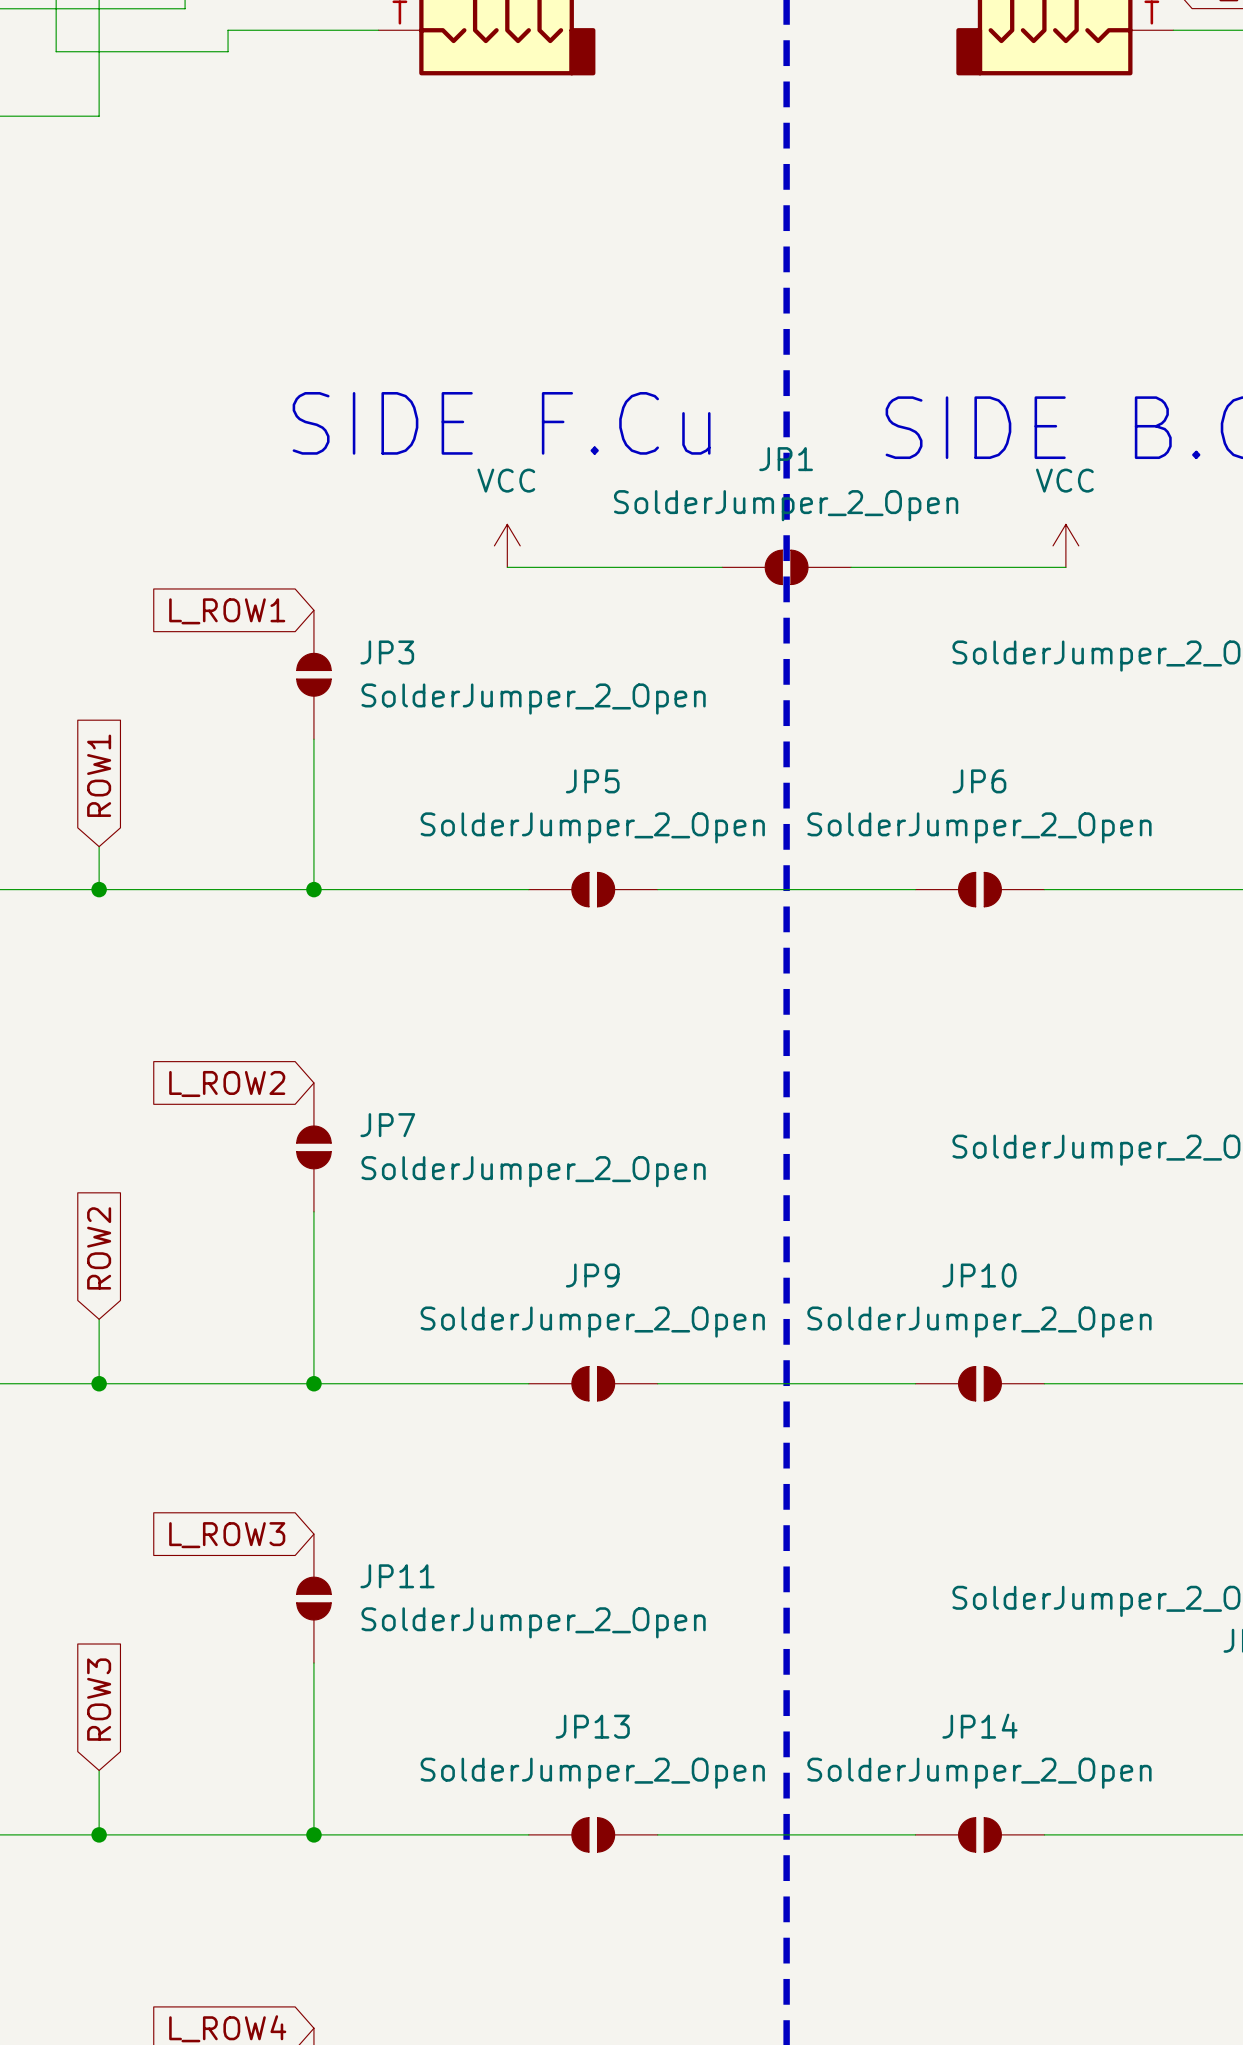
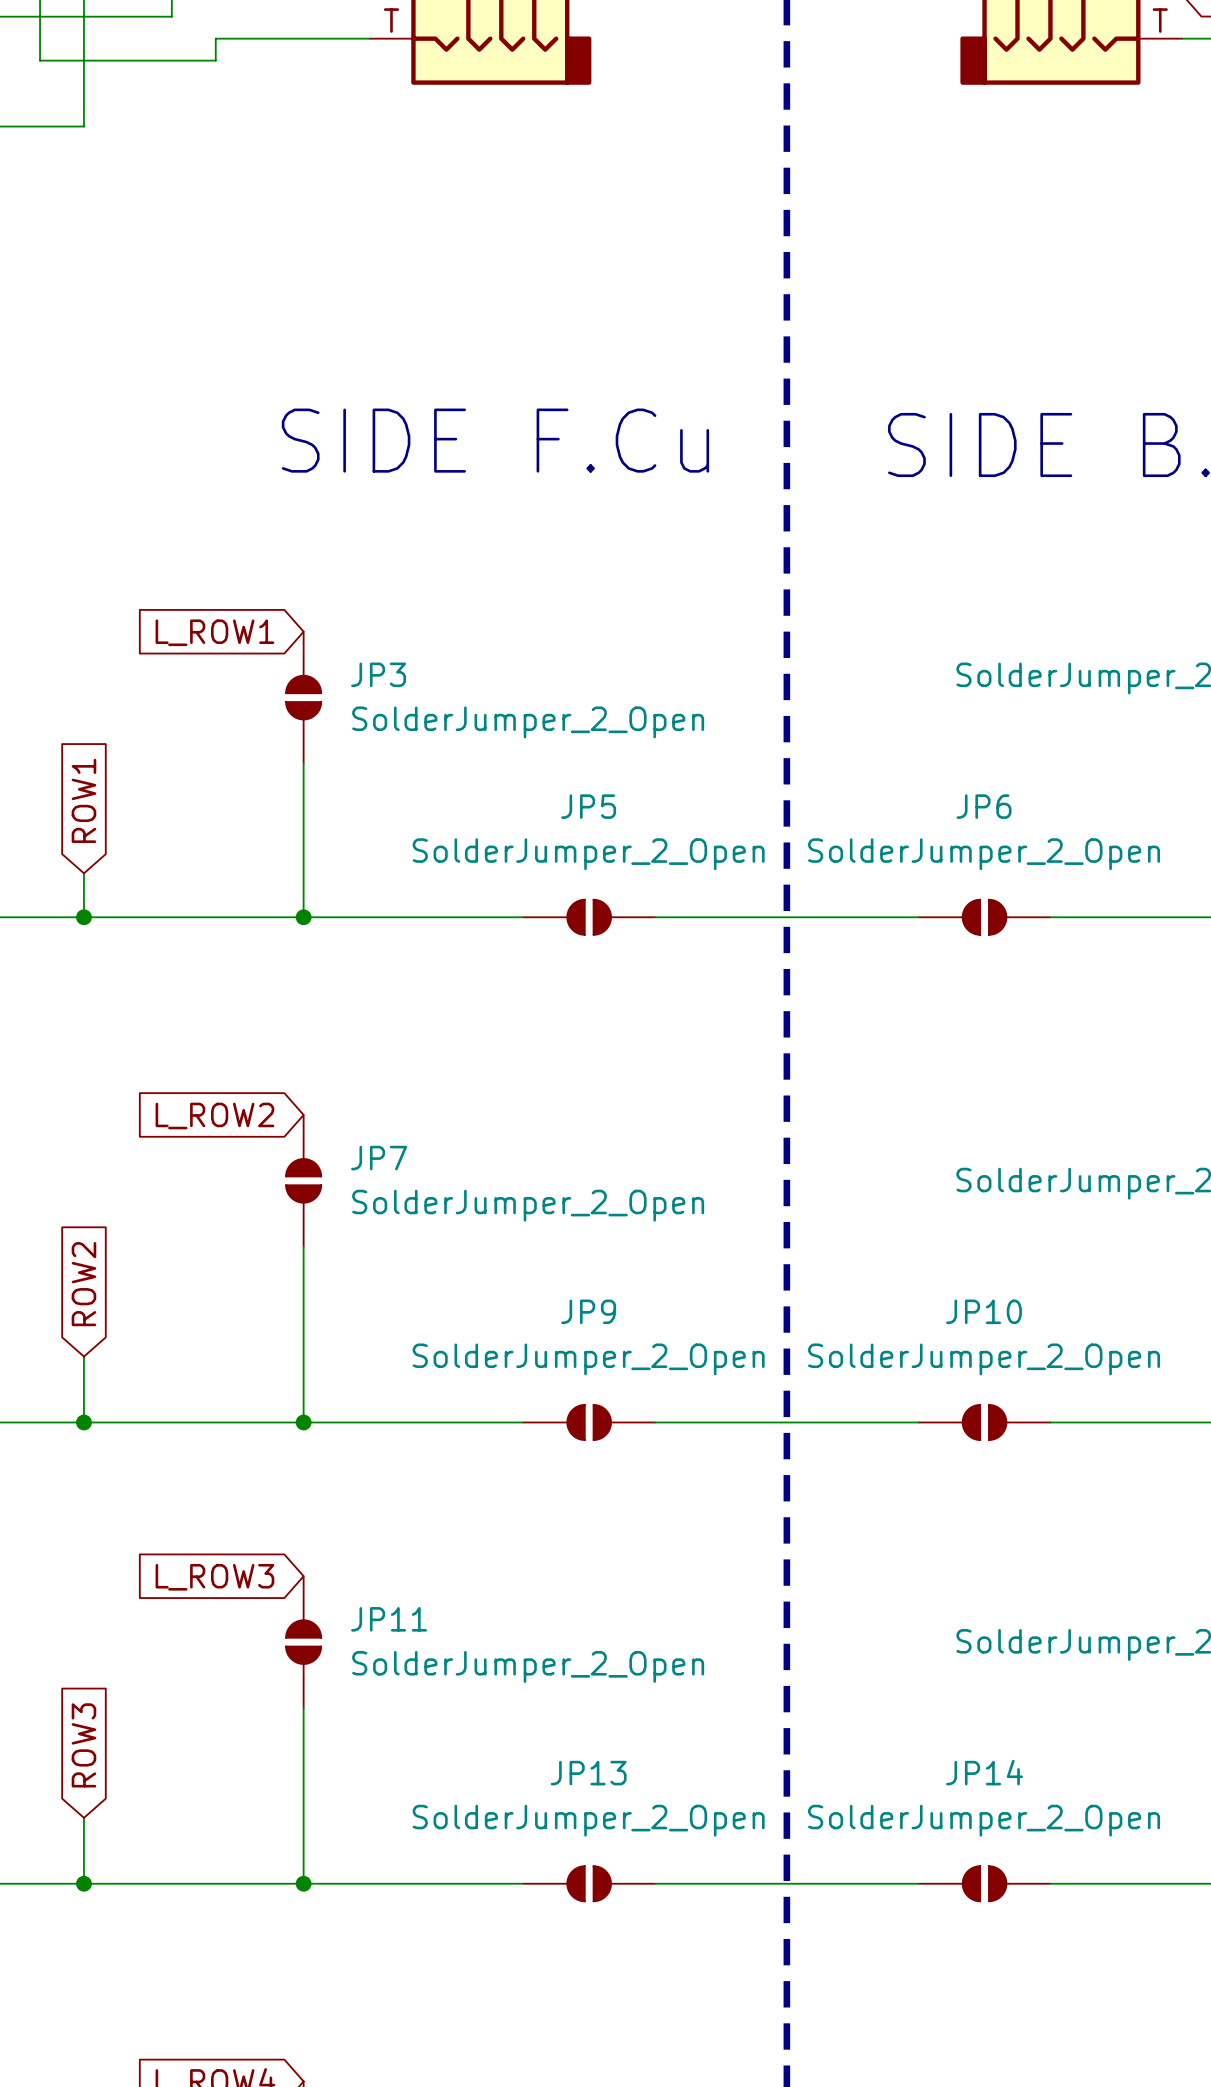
power symbol: VCC (507, 545) -> none
power symbol: VCC (1065, 545) -> none
wire: (507, 567) (722, 567) -> none
JP1: SolderJumper_2_Open (786, 567) -> none
wire: (851, 567) (1065, 567) -> none

